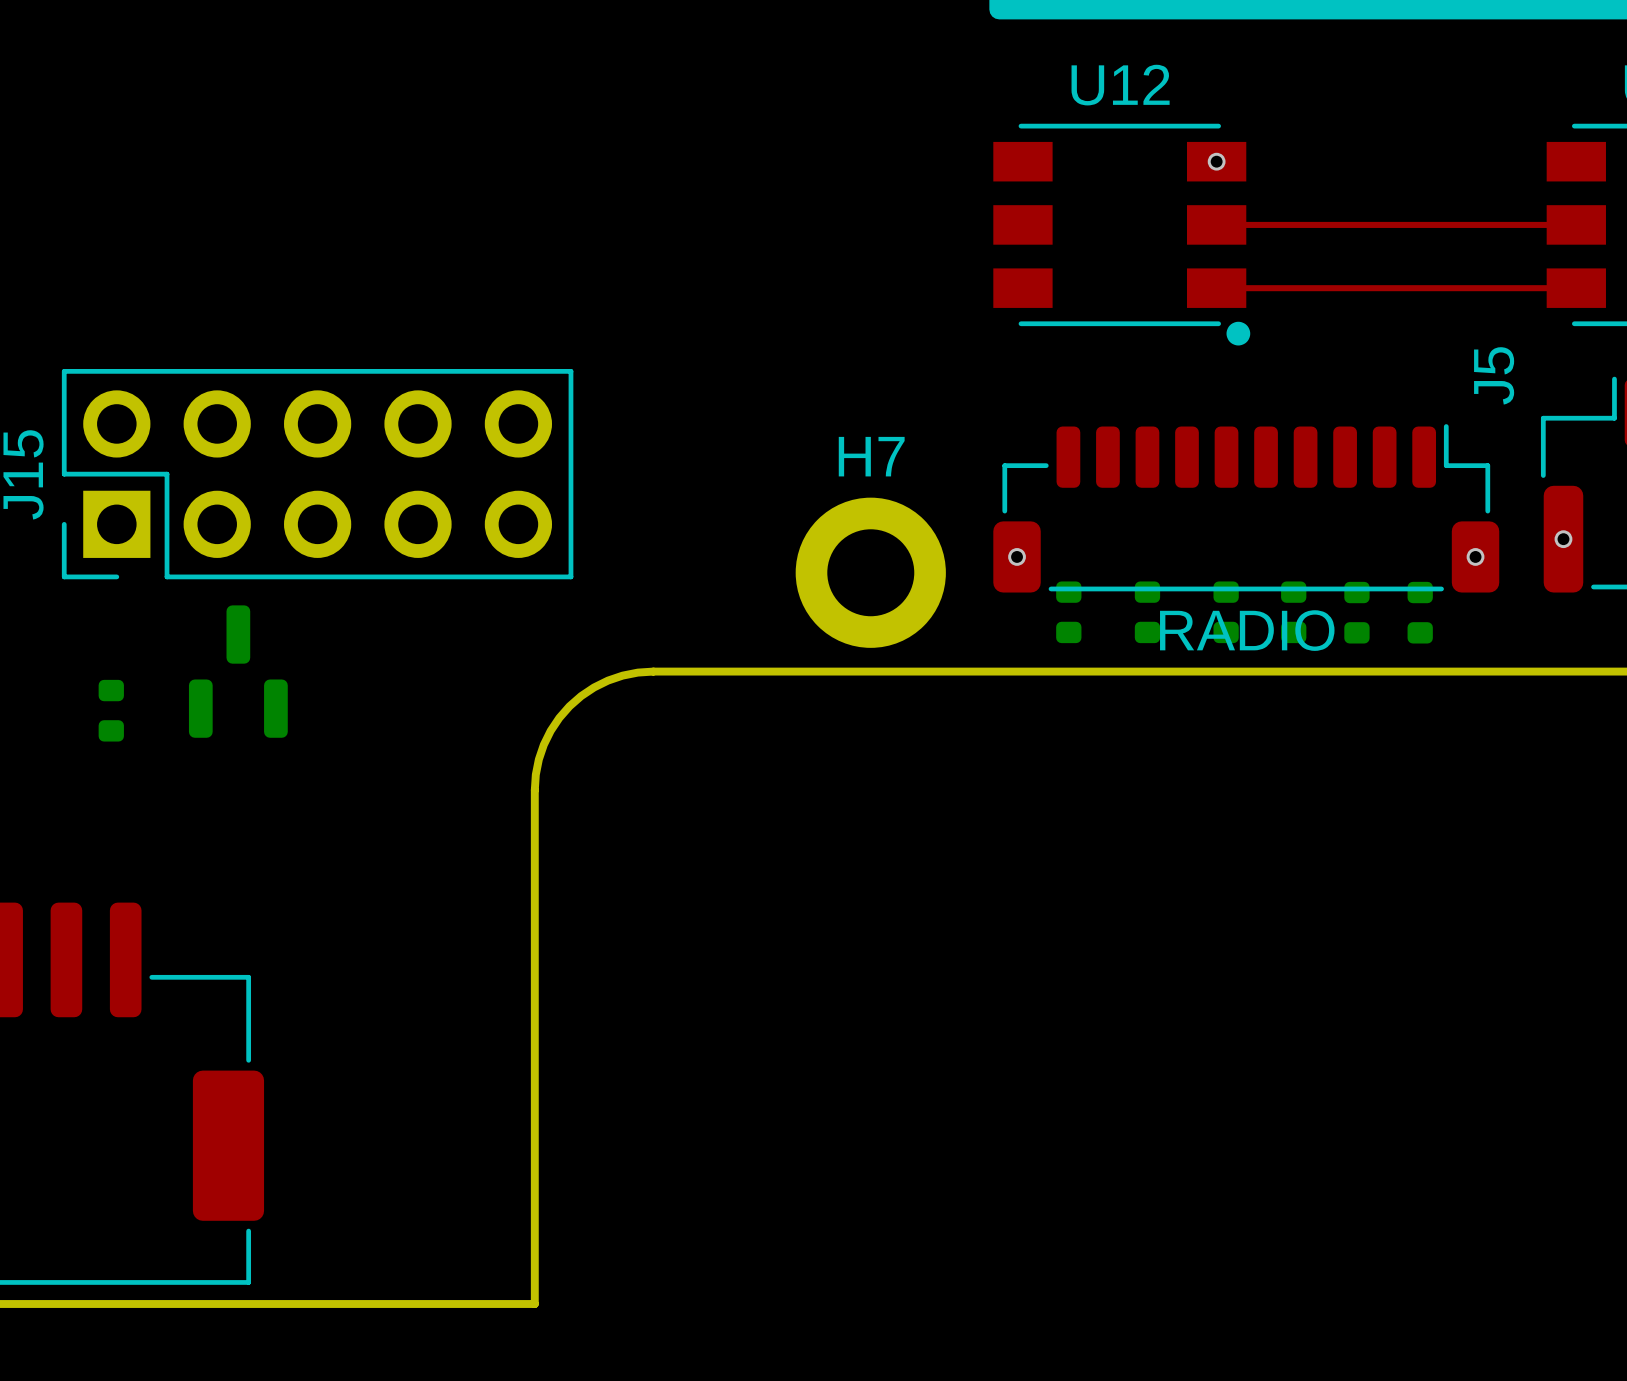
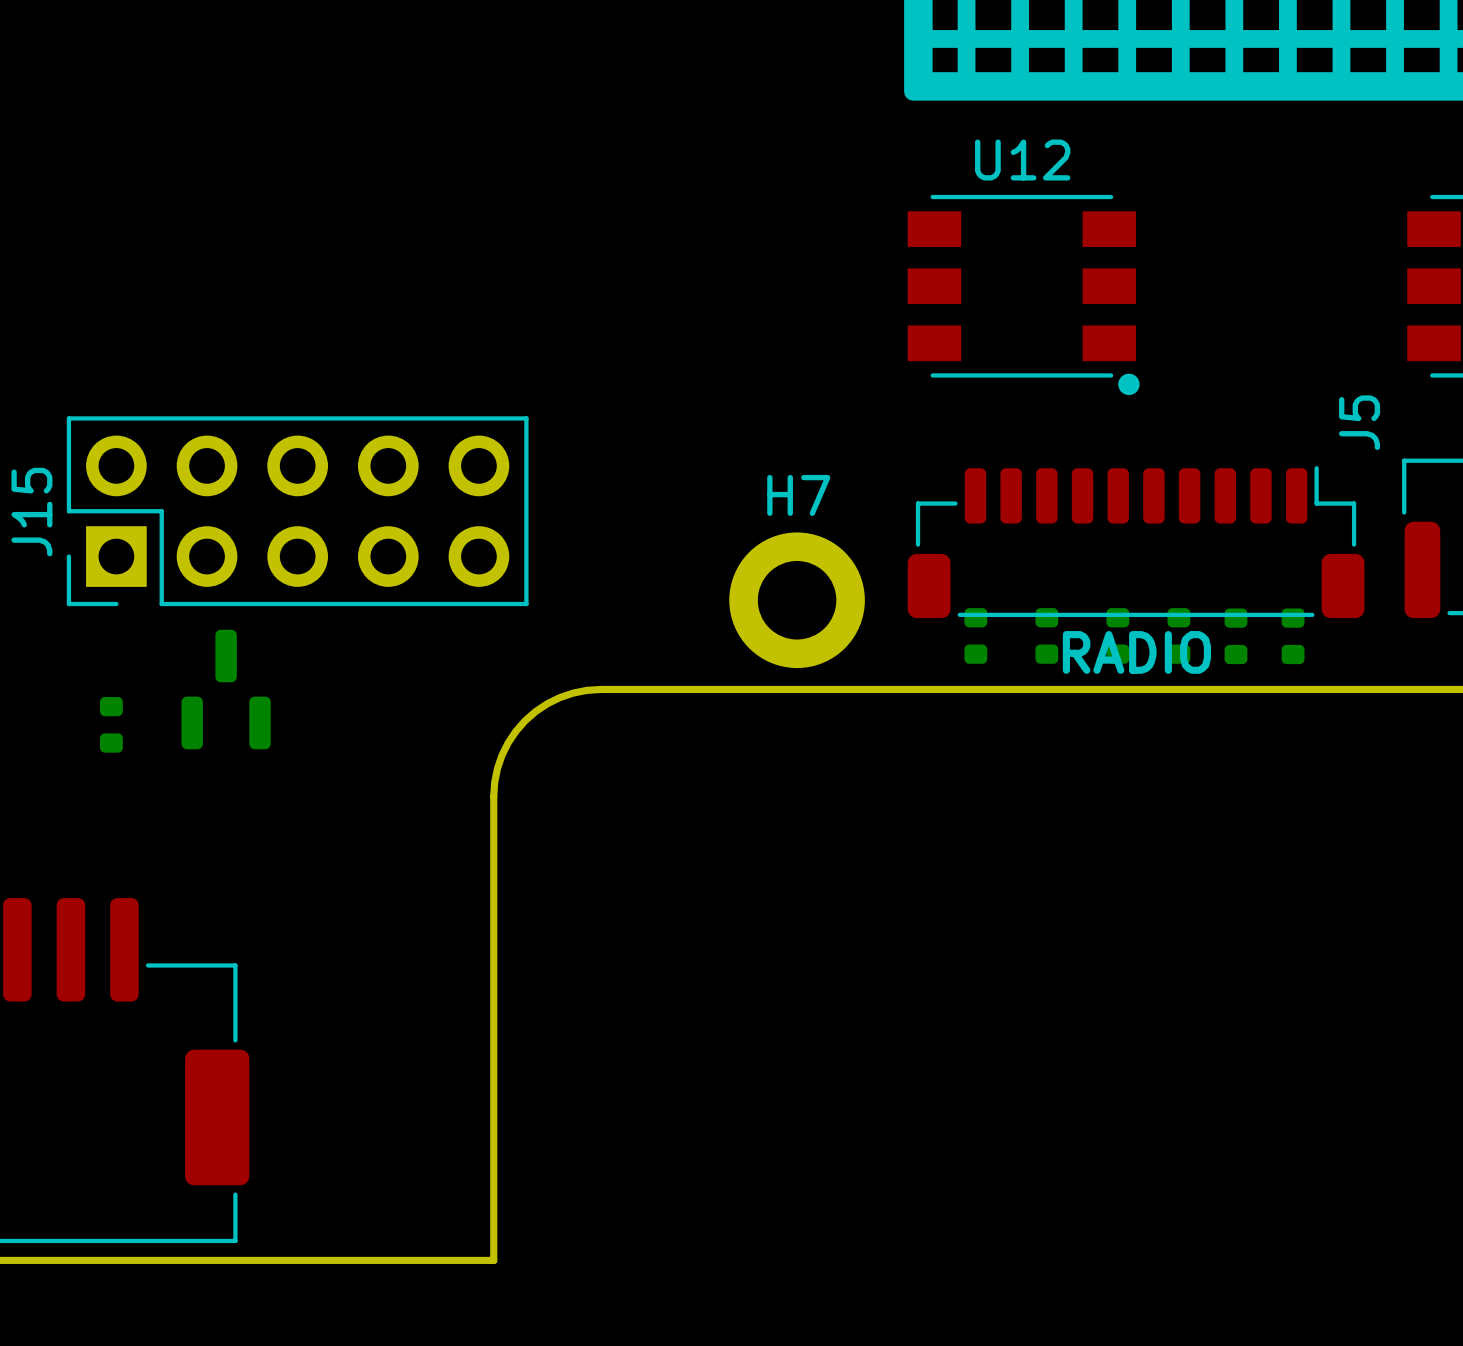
via: (1216, 161) -> none
top track: (1216, 224) (1576, 224) -> none
top track: (1216, 288) (1576, 288) -> none
via: (1563, 539) -> none
via: (1017, 556) -> none
via: (1475, 556) -> none

